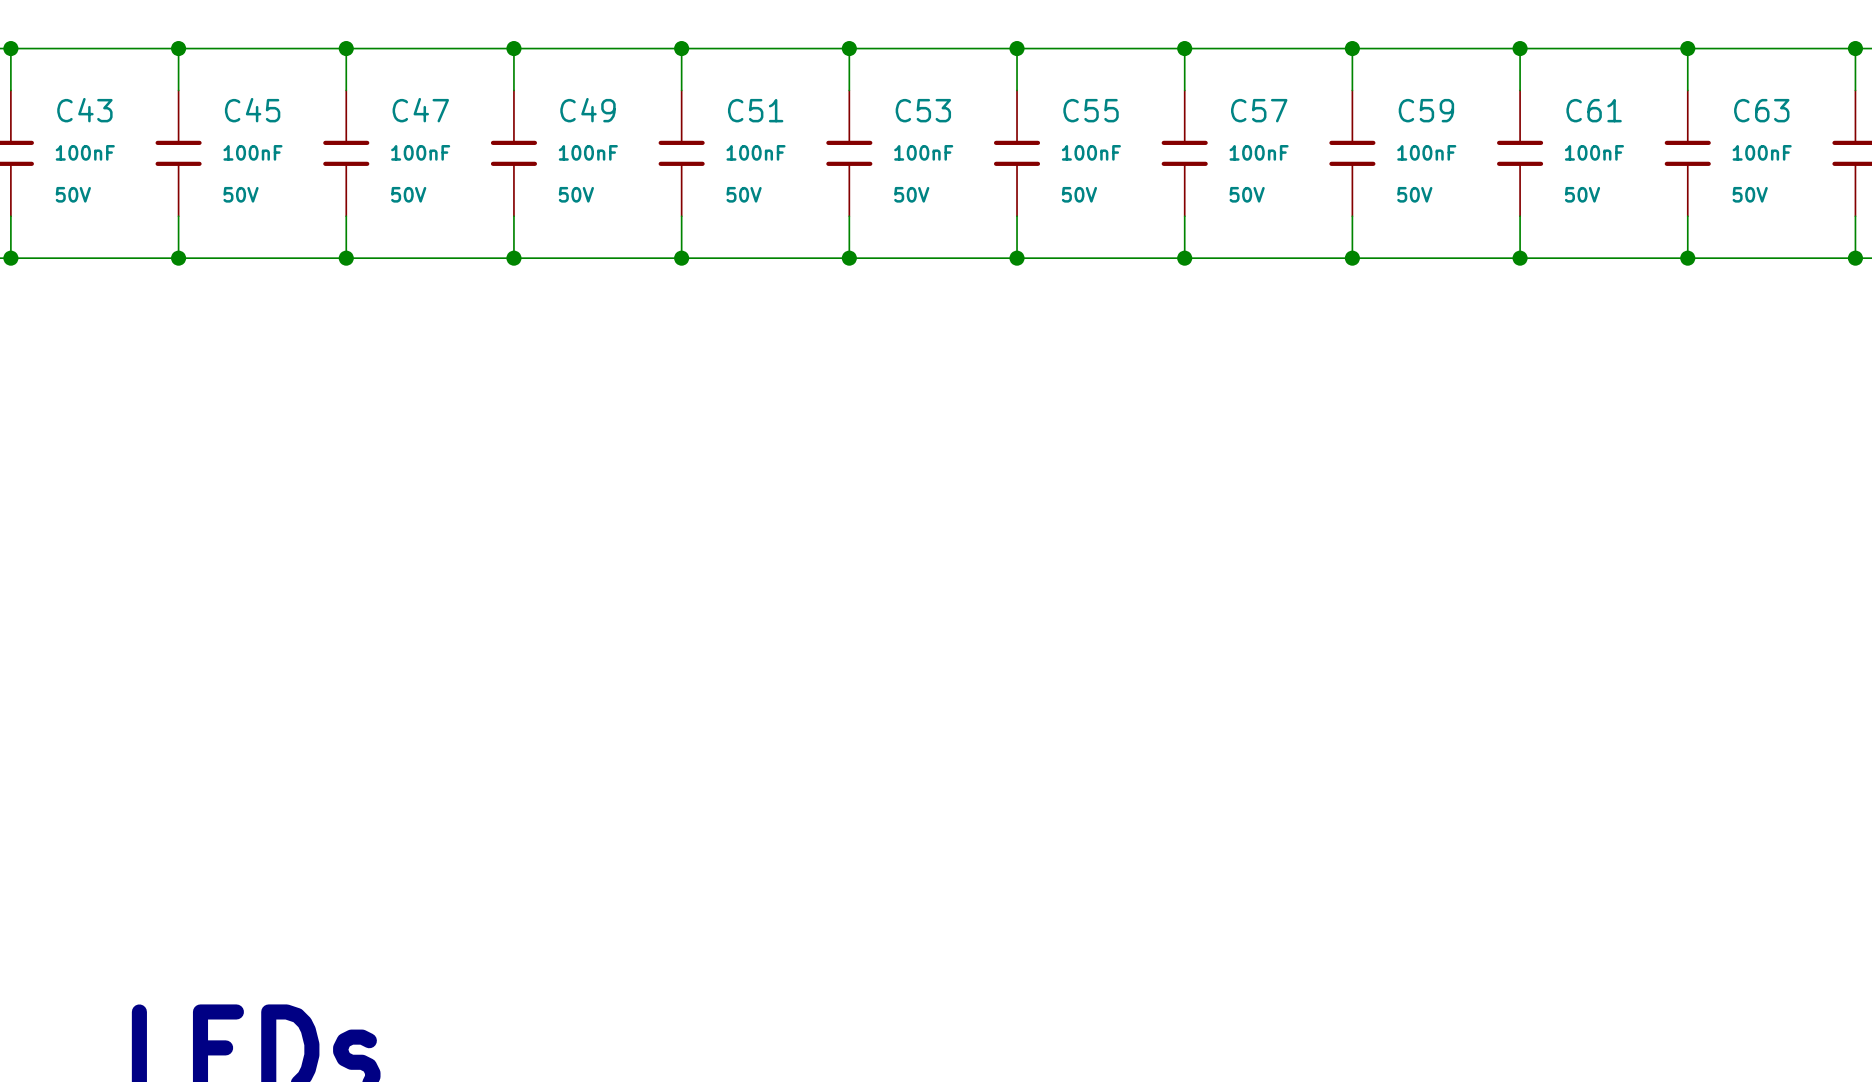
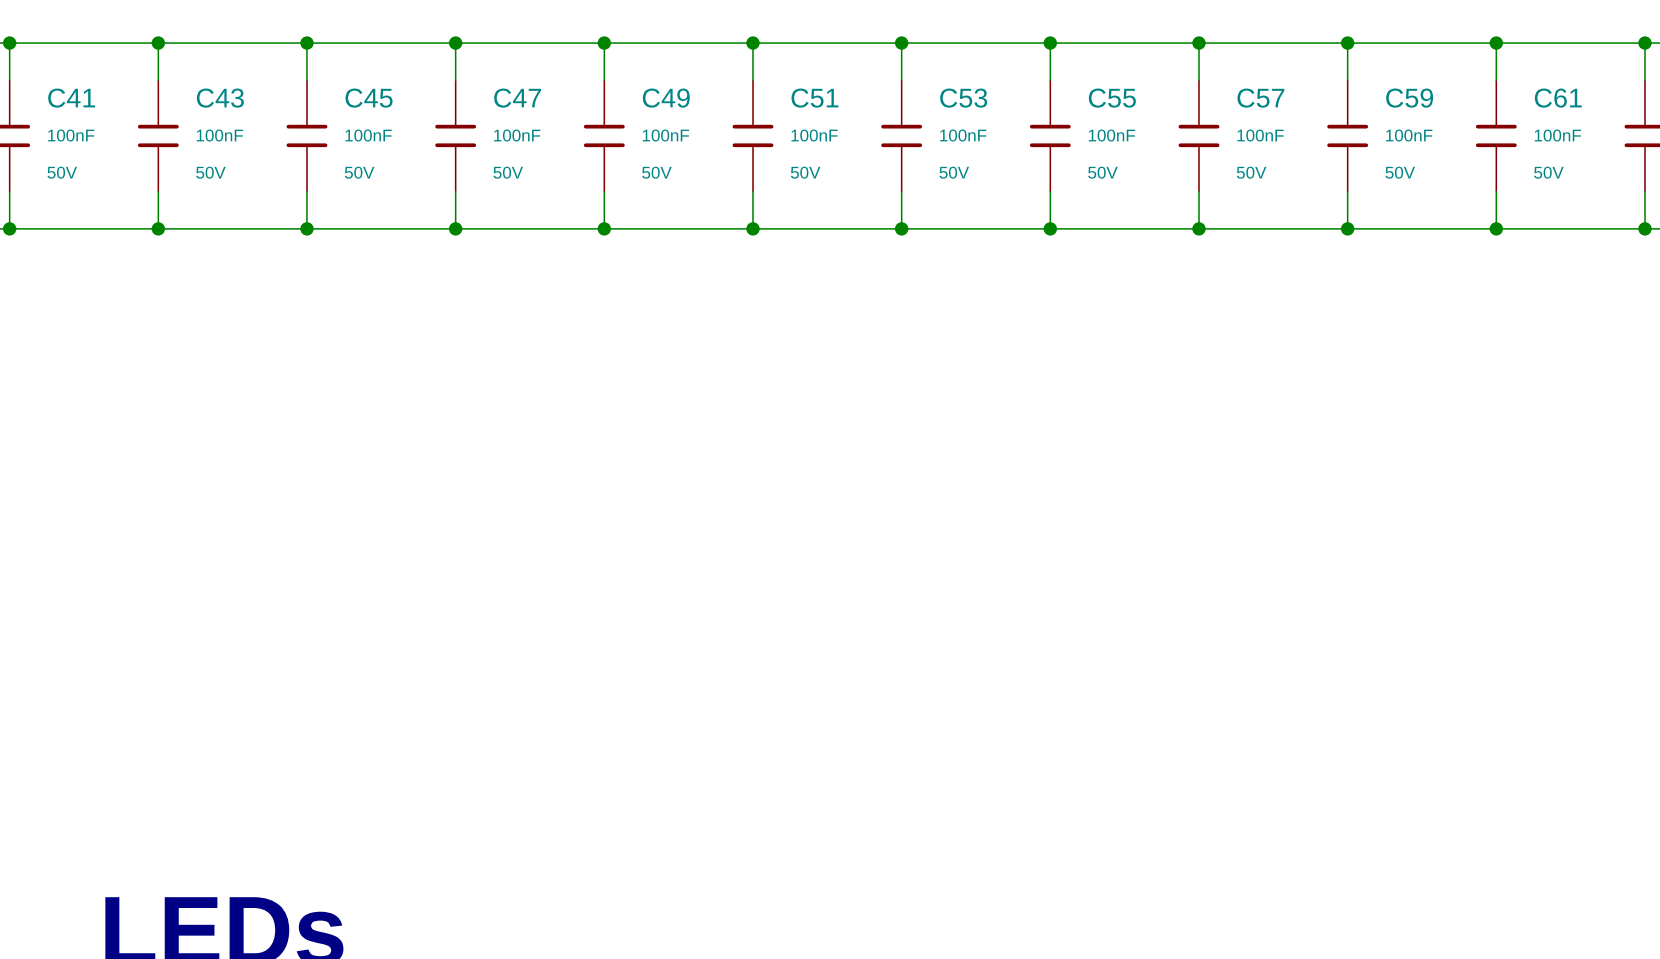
C43 name: C43 (84, 110) -> C41 (71, 98)
C45 name: C45 (252, 110) -> C43 (220, 98)
C47 name: C47 (420, 110) -> C45 (369, 98)
C49 name: C49 (587, 110) -> C47 (517, 98)
C51 name: C51 (755, 110) -> C49 (666, 98)
C53 name: C53 (923, 110) -> C51 (814, 98)
C55 name: C55 (1091, 110) -> C53 (963, 98)
C57 name: C57 (1259, 110) -> C55 (1112, 98)
C59 name: C59 (1426, 110) -> C57 (1260, 98)
C61 name: C61 (1594, 110) -> C59 (1409, 98)
C63 name: C63 (1761, 110) -> C61 (1558, 98)

